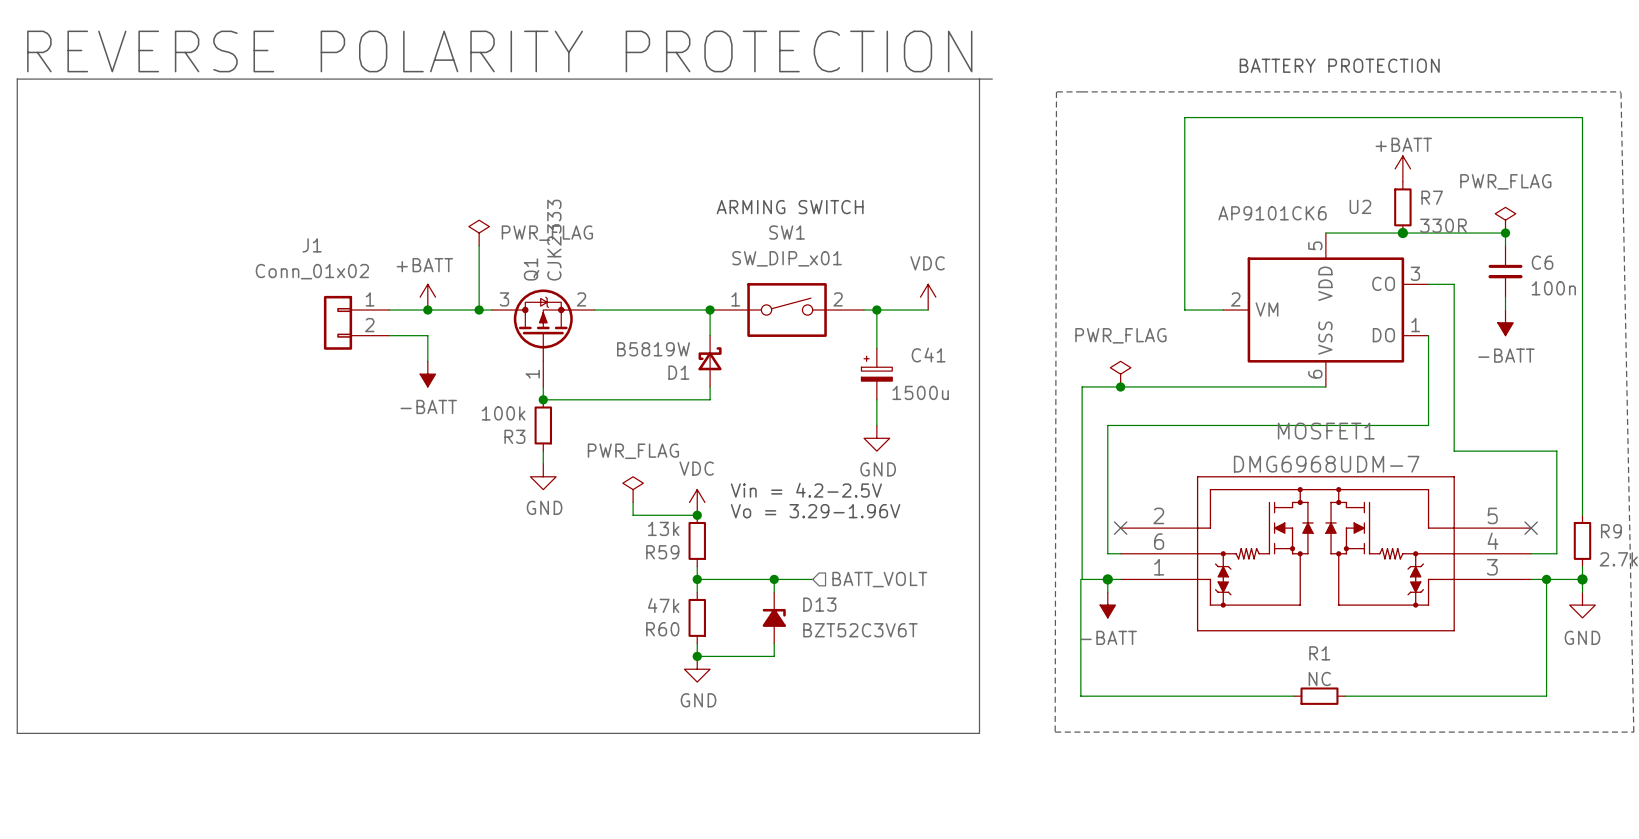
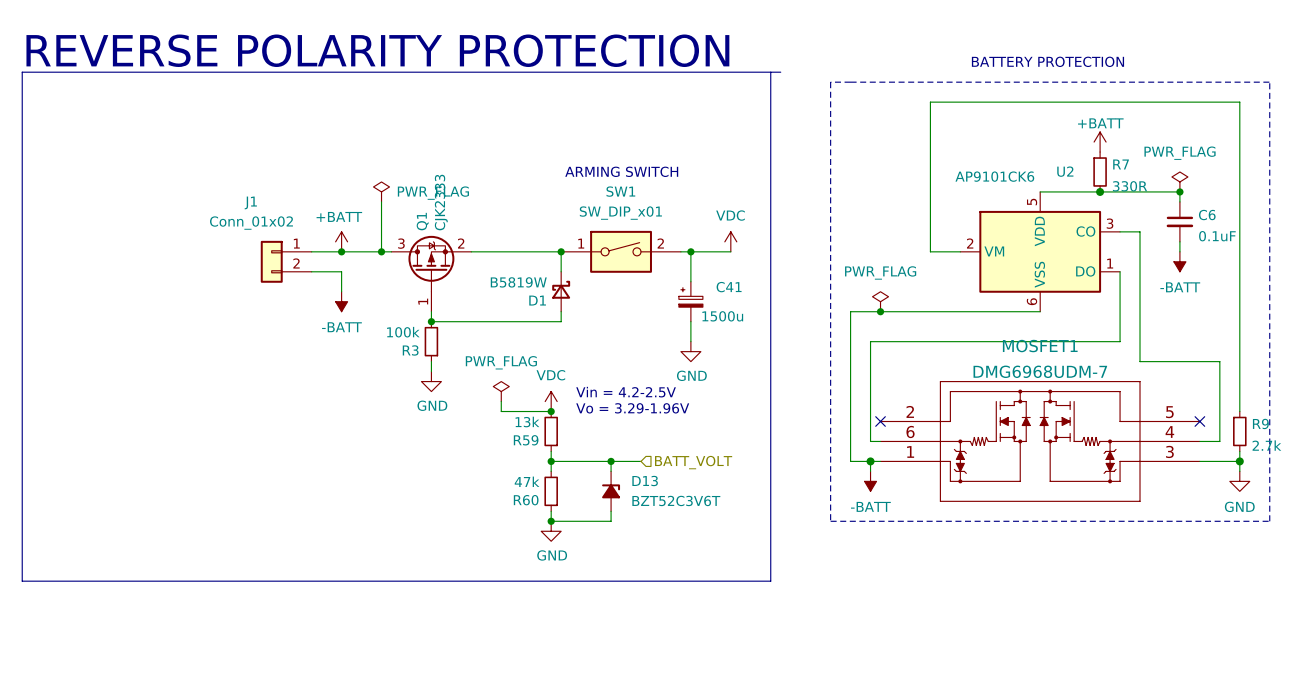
line: (1056, 91) (1055, 732) (1633, 732) (1620, 91) -> (830, 82) (830, 521) (1269, 521) (1269, 82)
C6 value: 100n (1553, 288) -> 0.1uF (1217, 236)
wire: (1080, 579) (1080, 696) (1293, 696) -> none
wire: (1546, 579) (1546, 696) (1345, 696) -> none
junction: (1546, 579) -> none
R1: NC (1319, 696) -> none

